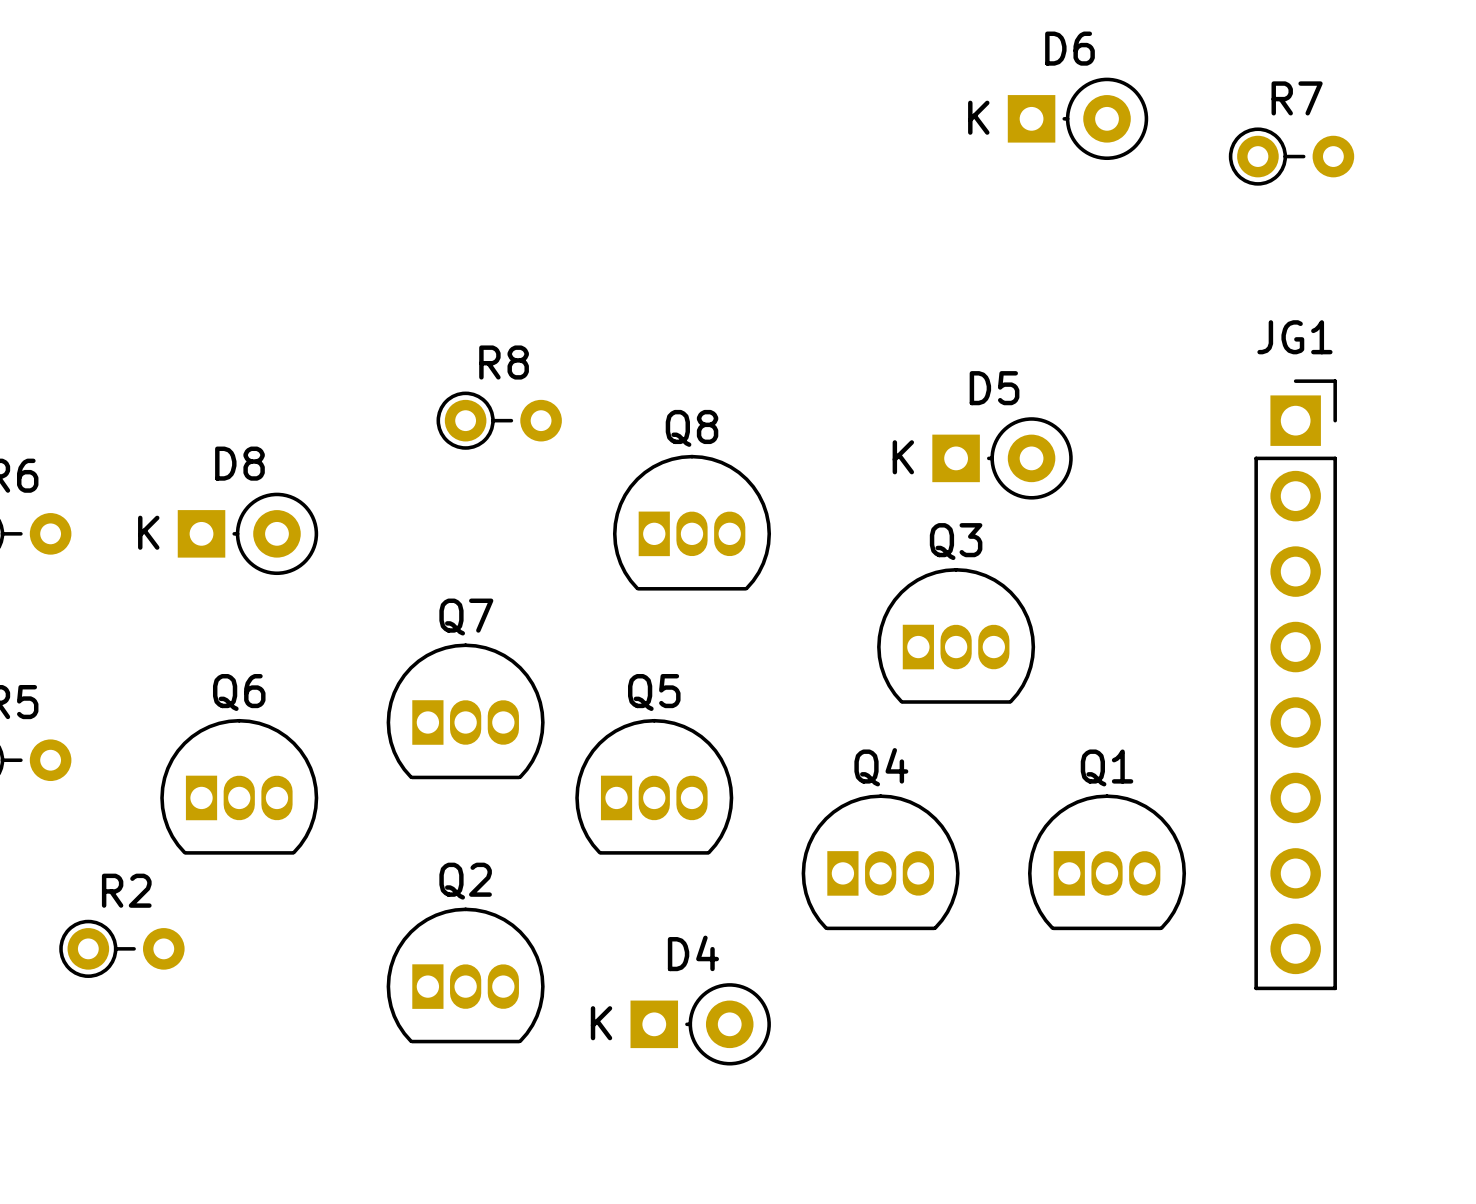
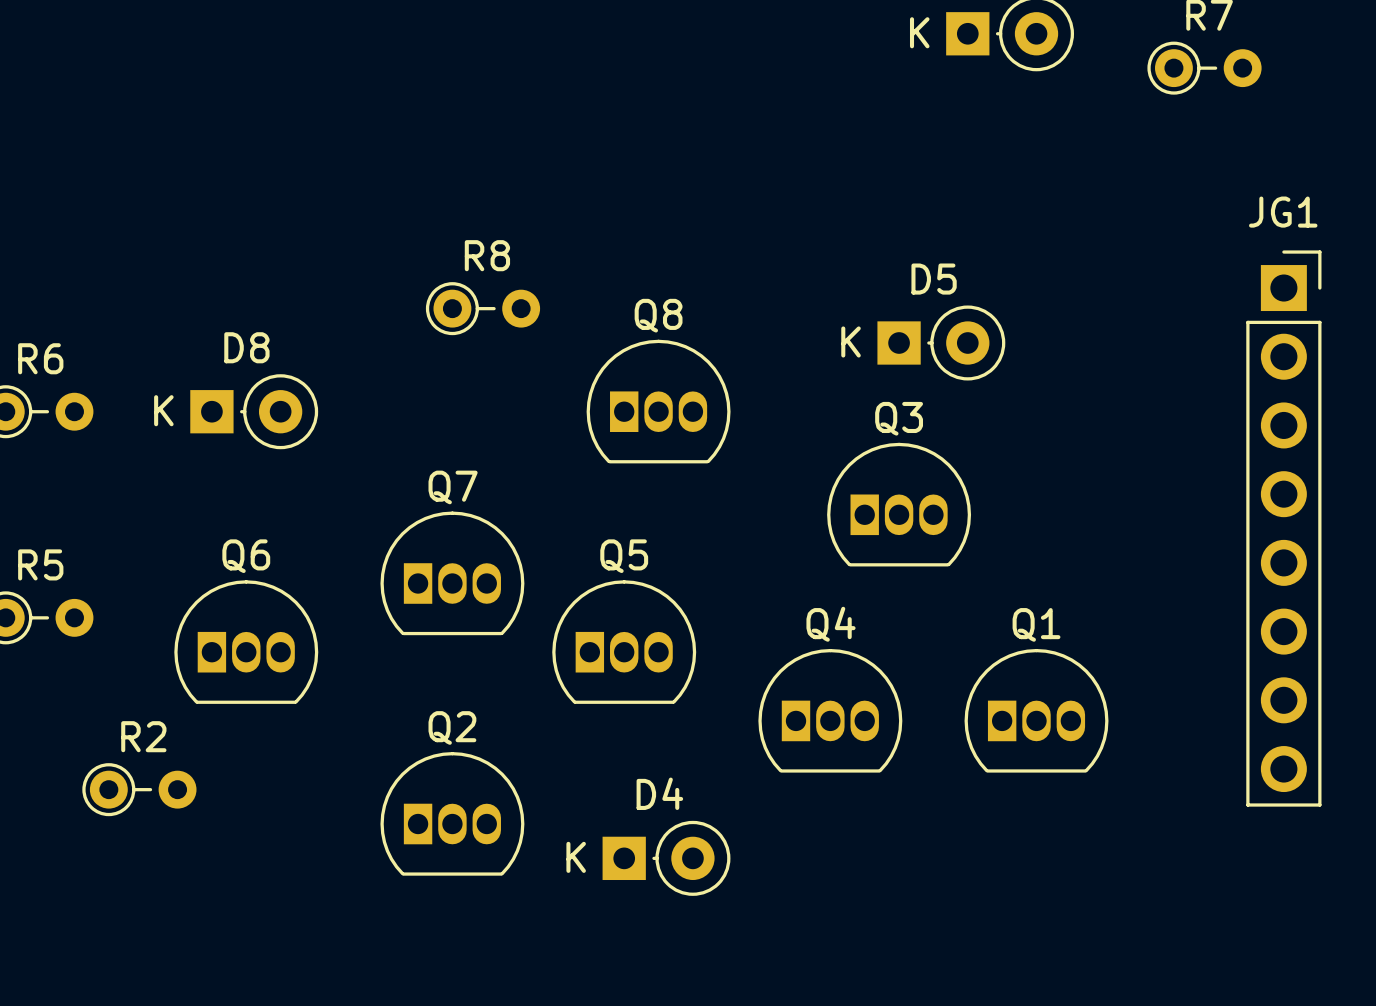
JG1 position: (1295, 684) -> (1283, 528)

